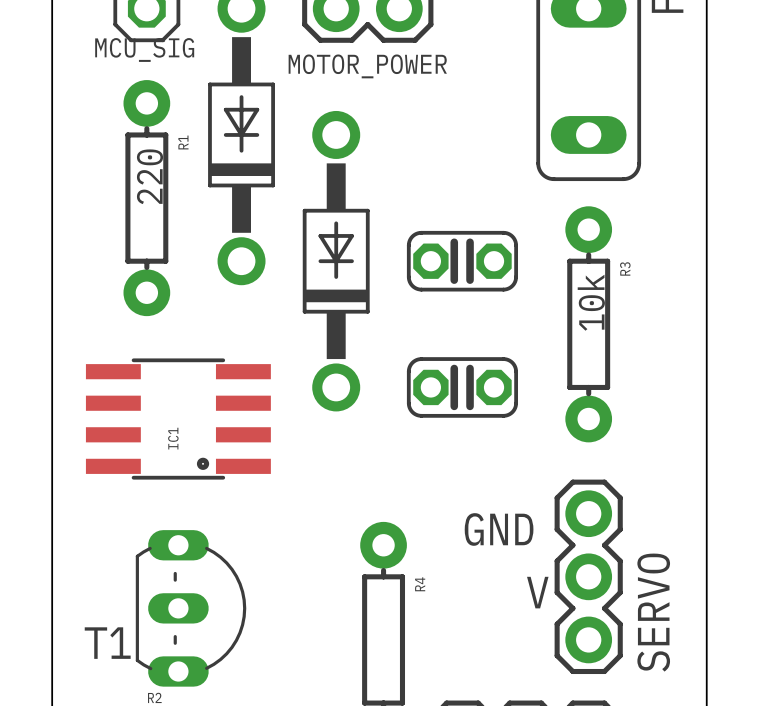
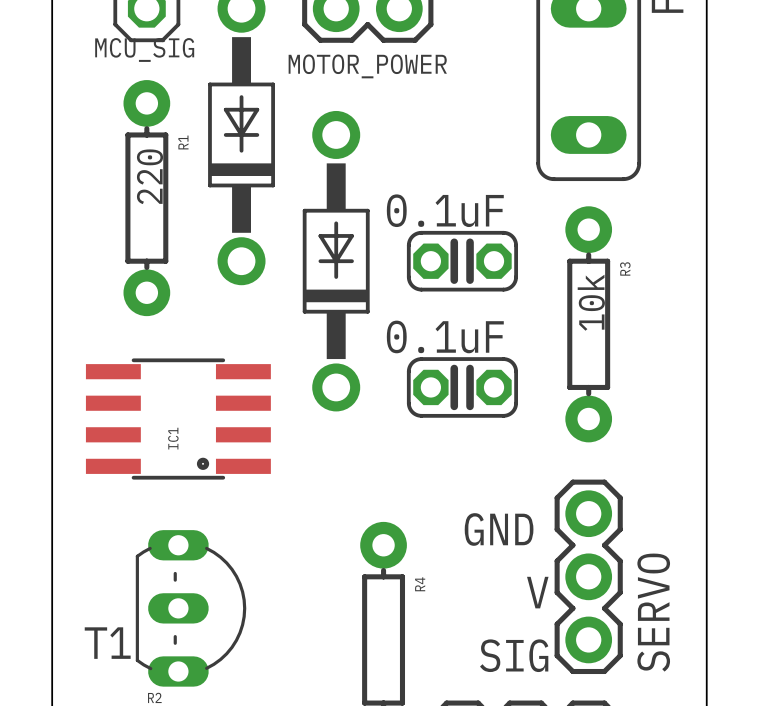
part value: none -> 0.1uF (445, 210)
part value: none -> 0.1uF (445, 336)
text: none -> SIG (514, 655)

